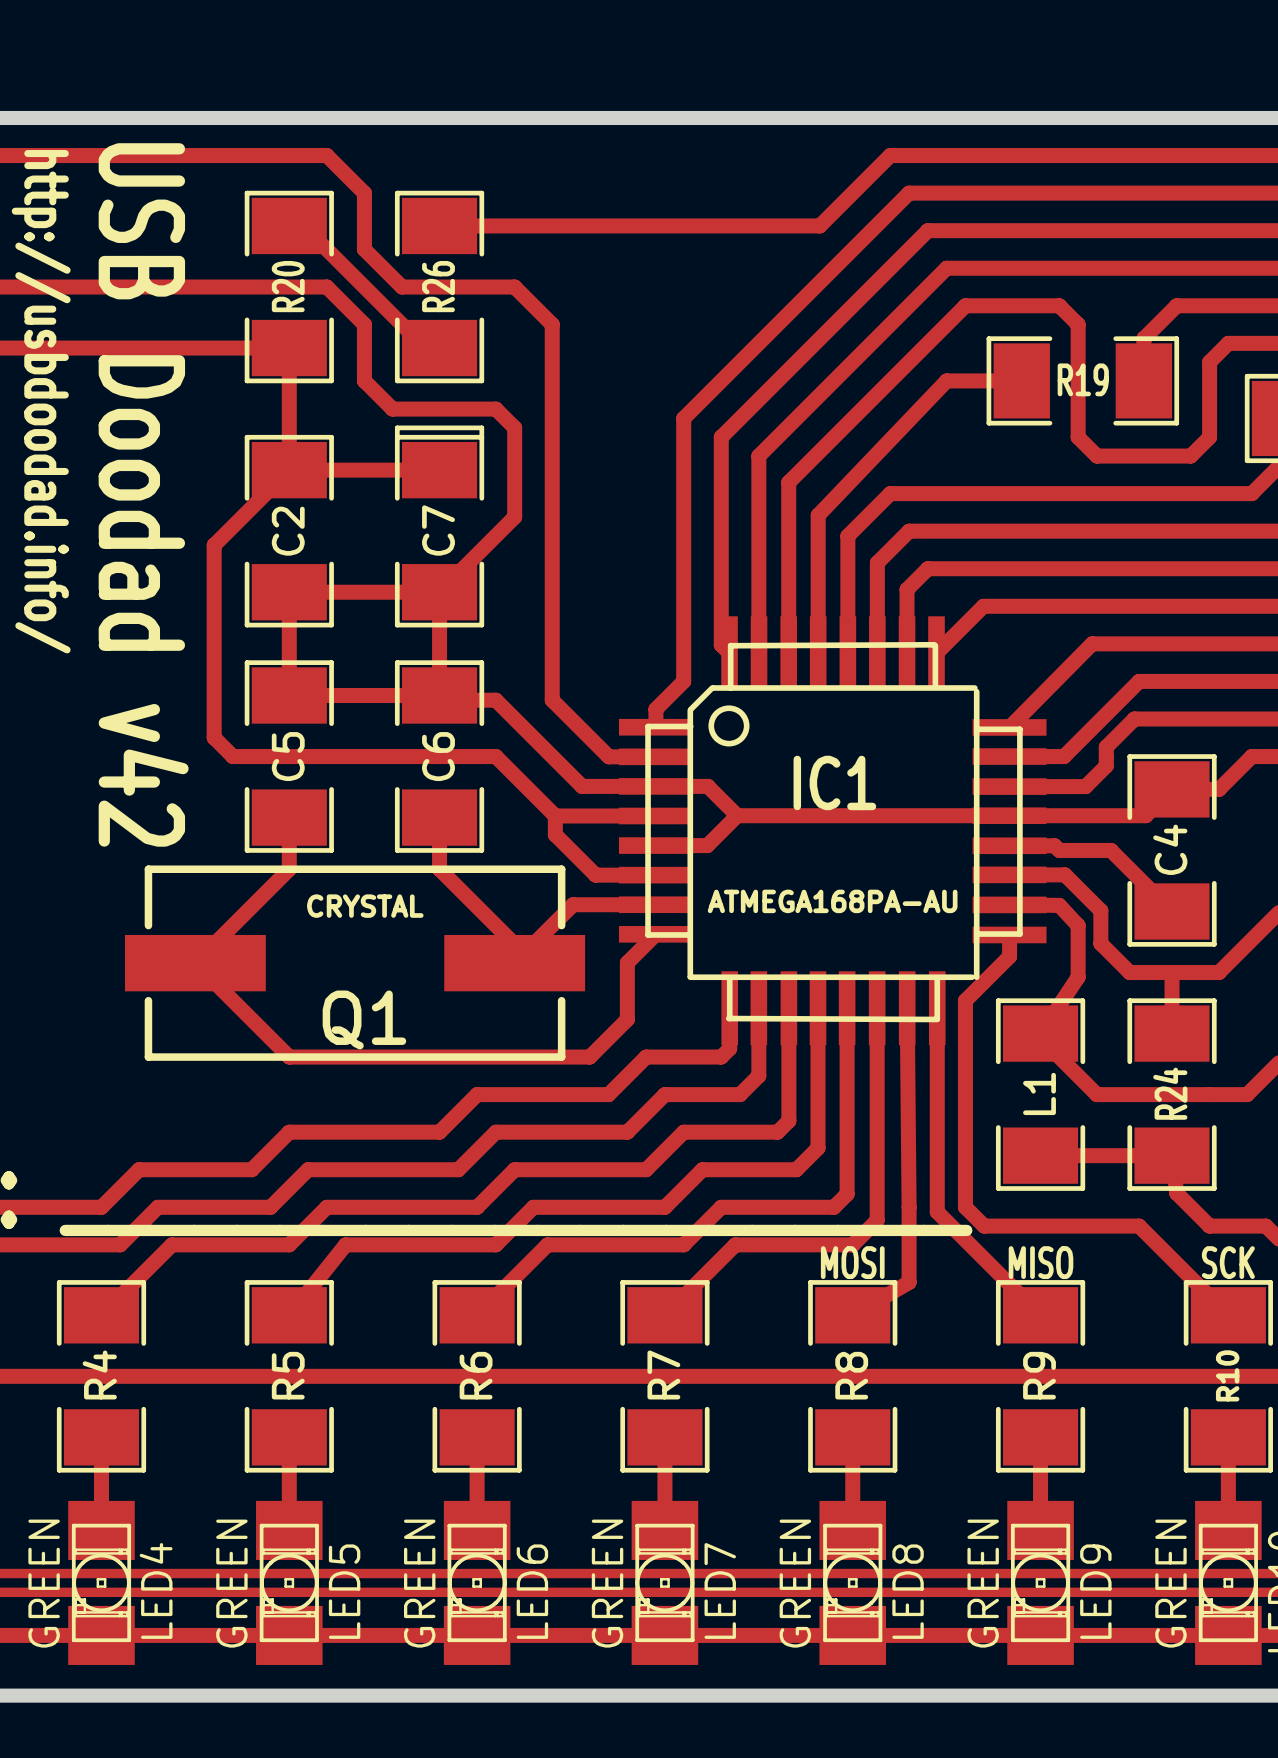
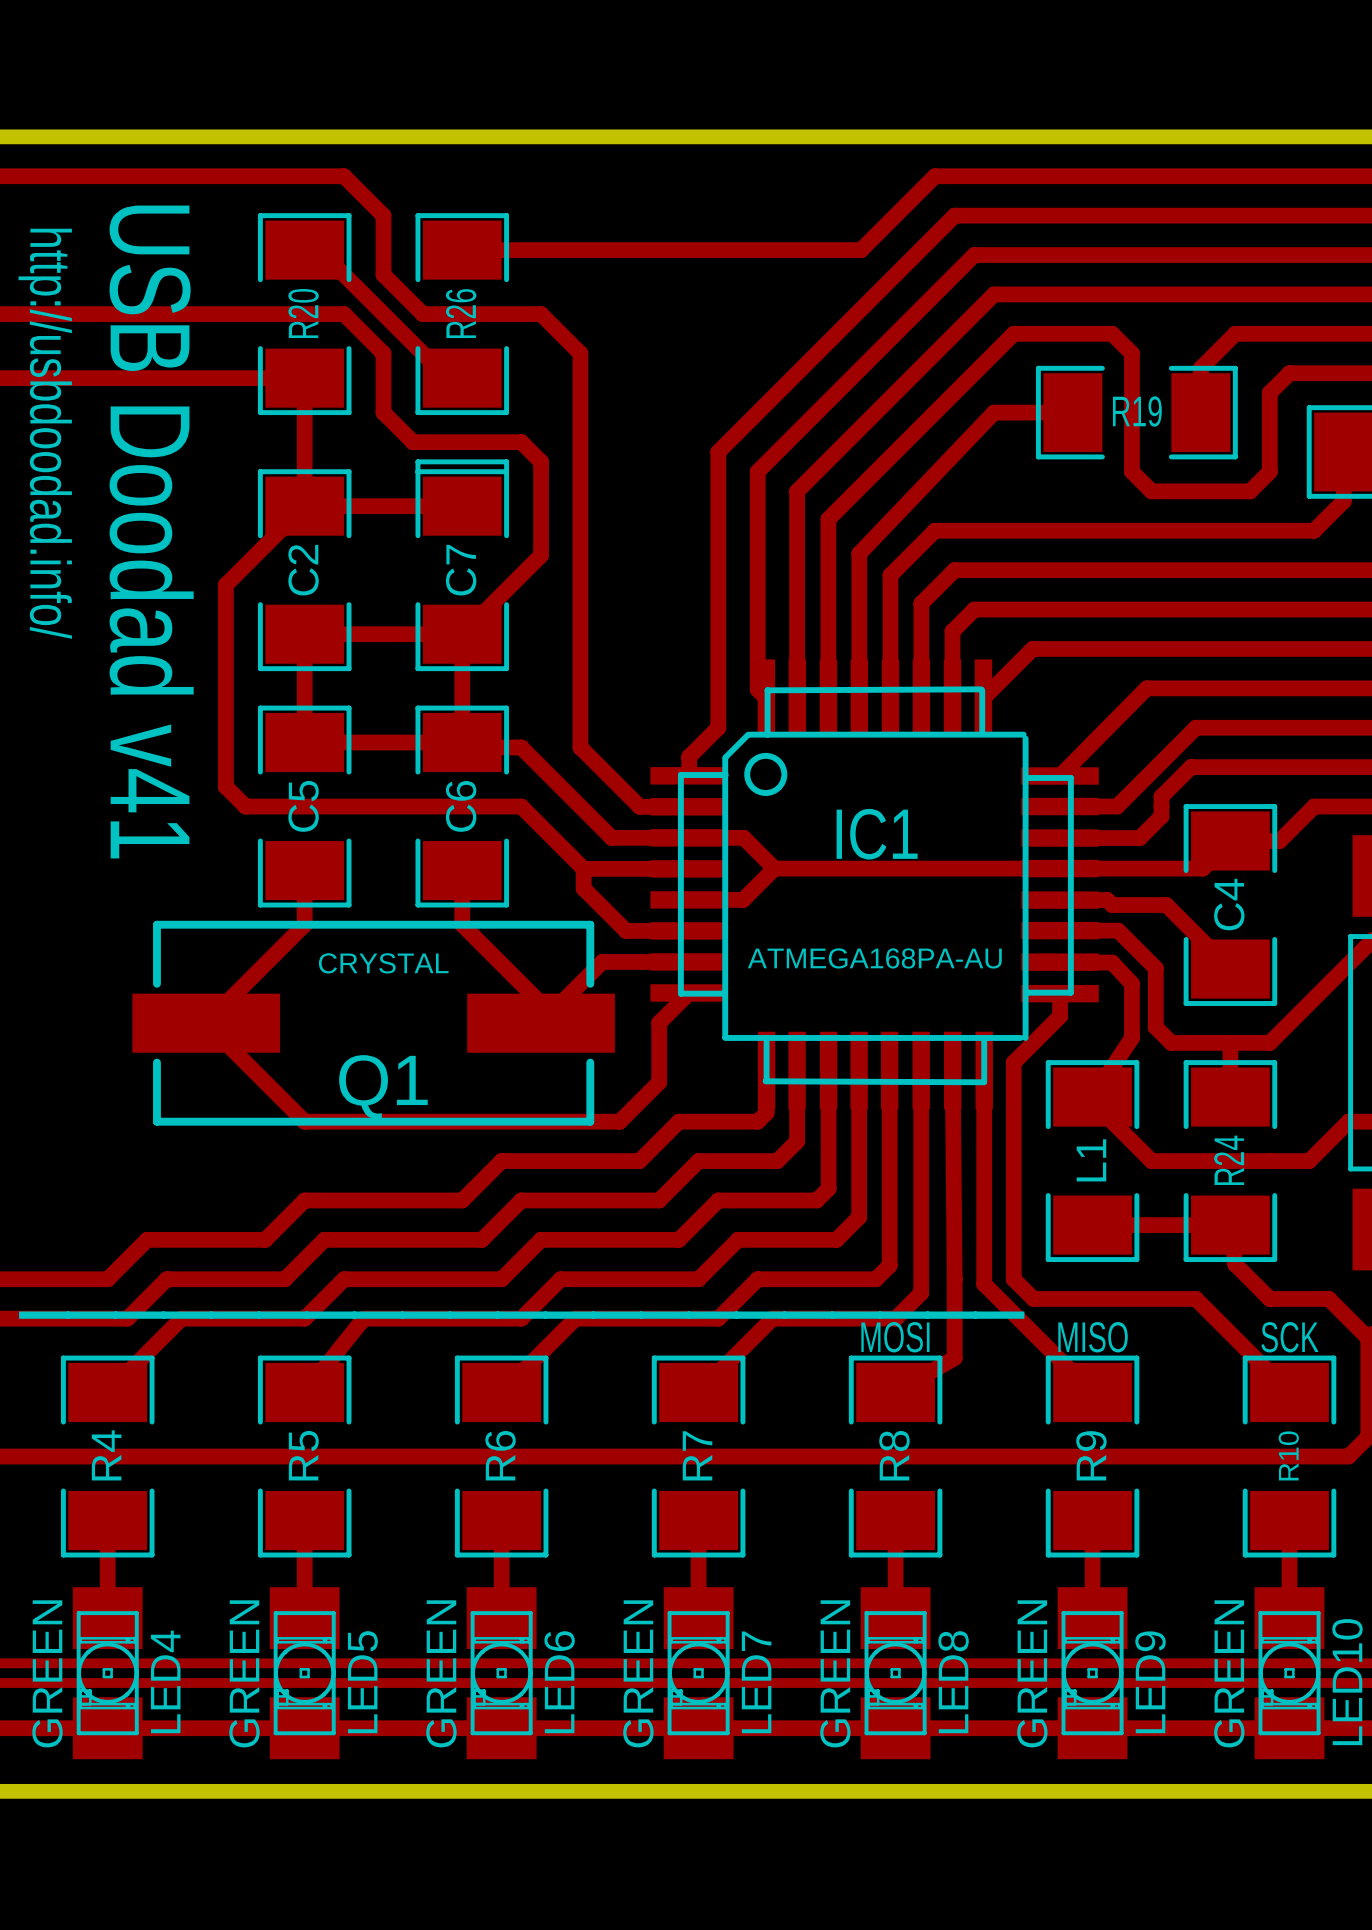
text: USB Doodad v42 (143, 494) -> USB Doodad v41 (151, 532)
top track: (1100, 943) (1129, 972) (1218, 972) -> (1155, 1002) (1155, 1027) (1171, 1042) (1269, 1042) (1279, 1033)

